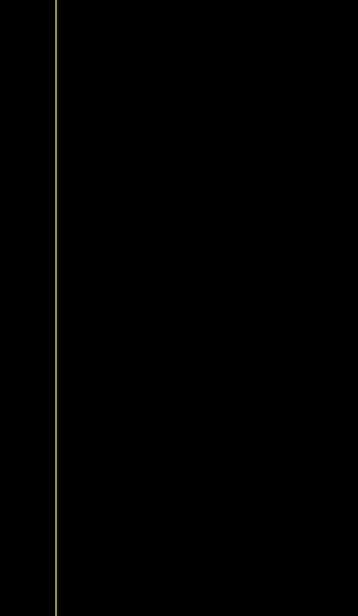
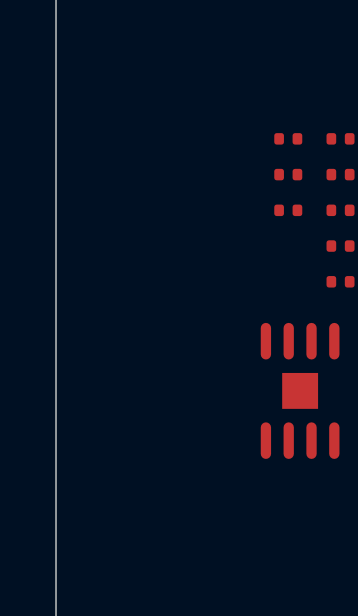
part: none -> (288, 138)
part: none -> (340, 138)
part: none -> (288, 174)
part: none -> (340, 174)
part: none -> (288, 210)
part: none -> (340, 210)
part: none -> (340, 246)
part: none -> (340, 281)
part: none -> (300, 390)

